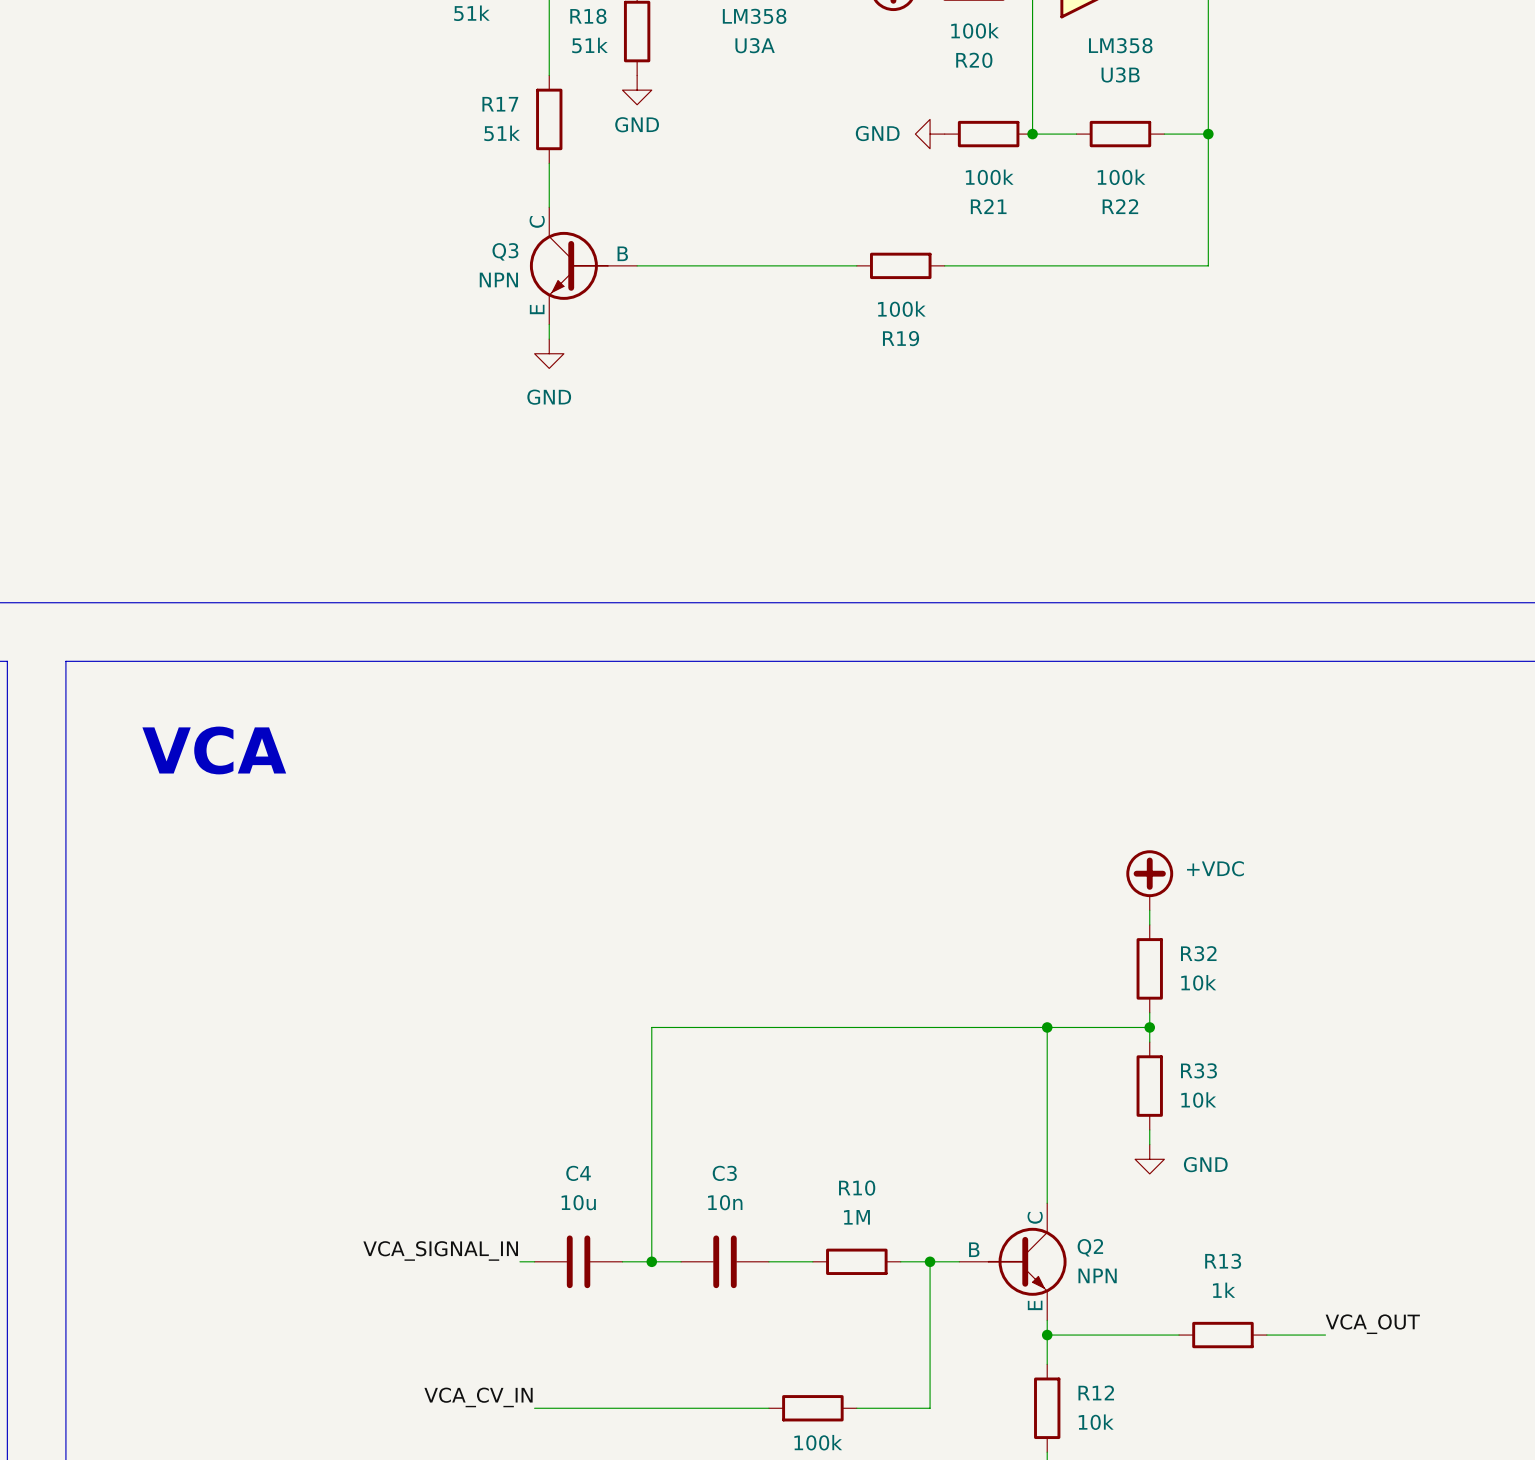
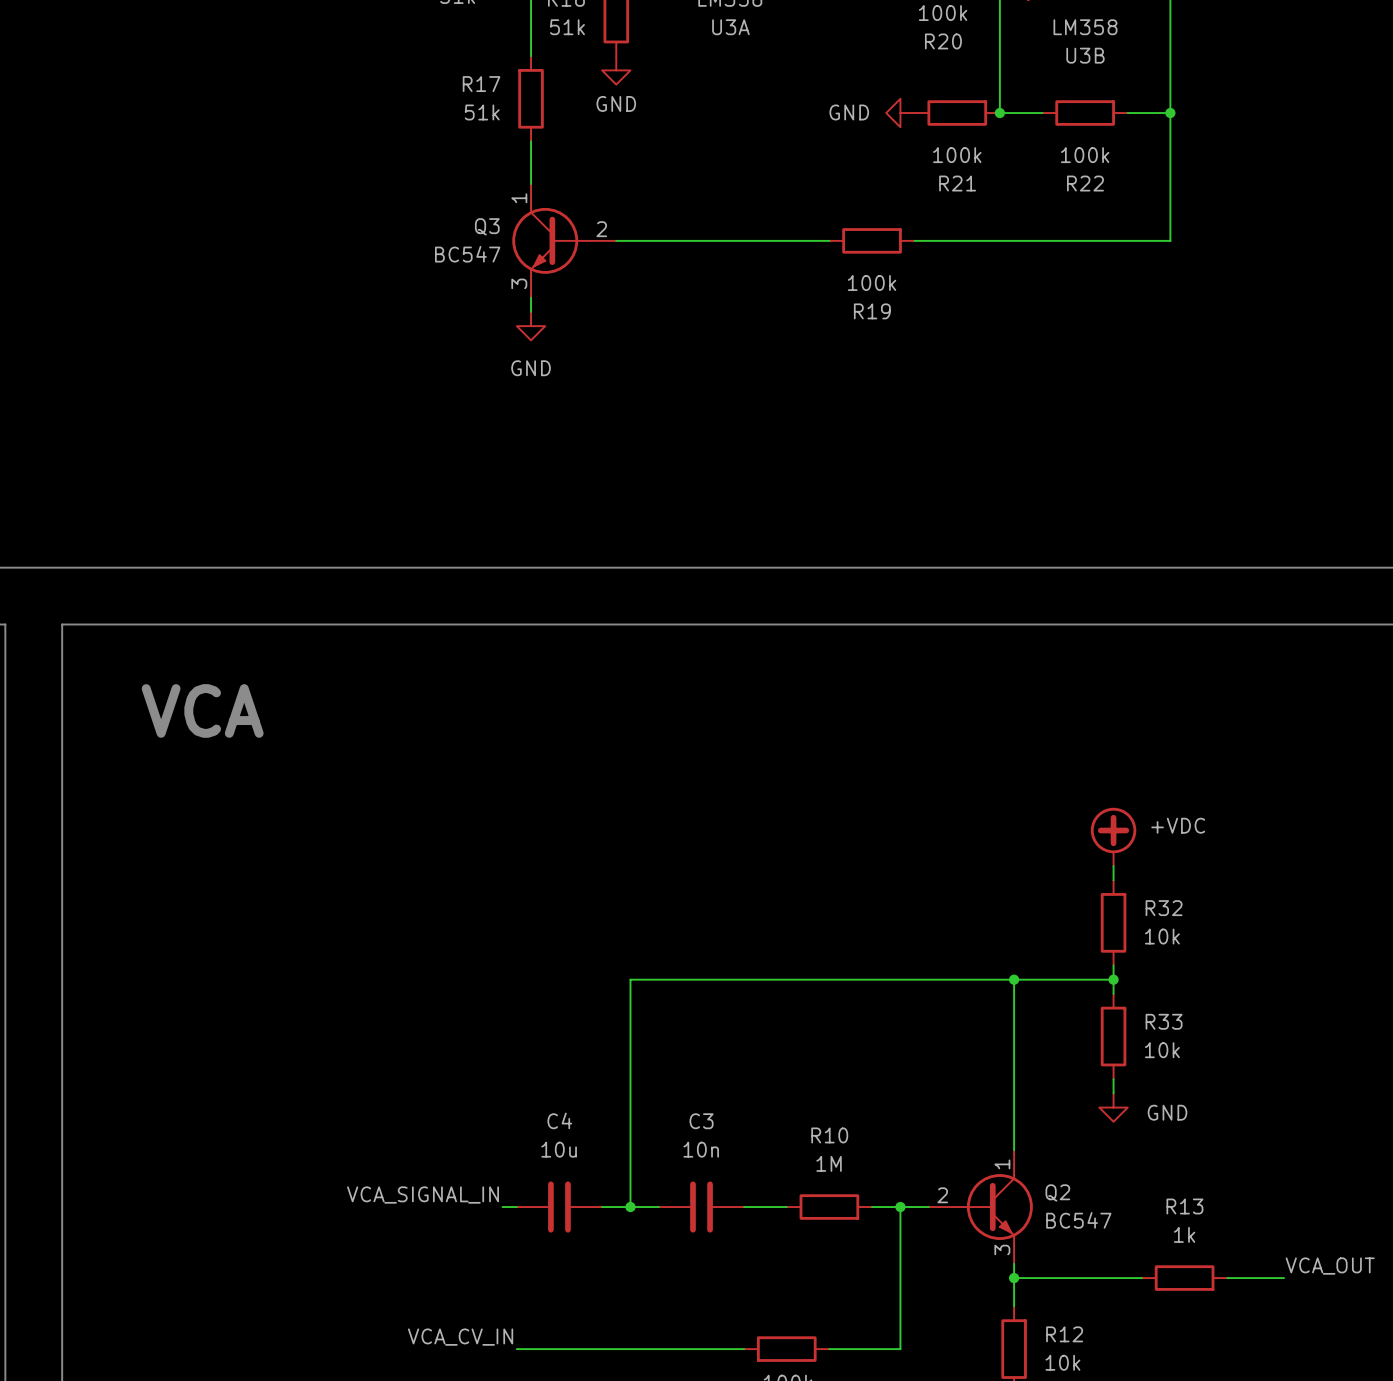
Q3 symbol: [529, 207, 638, 325] -> [512, 184, 617, 298]
Q3 value: NPN (498, 279) -> BC547 (467, 254)
Q2 symbol: [959, 1203, 1067, 1321] -> [928, 1150, 1033, 1264]
Q2 value: NPN (1097, 1275) -> BC547 (1078, 1220)

